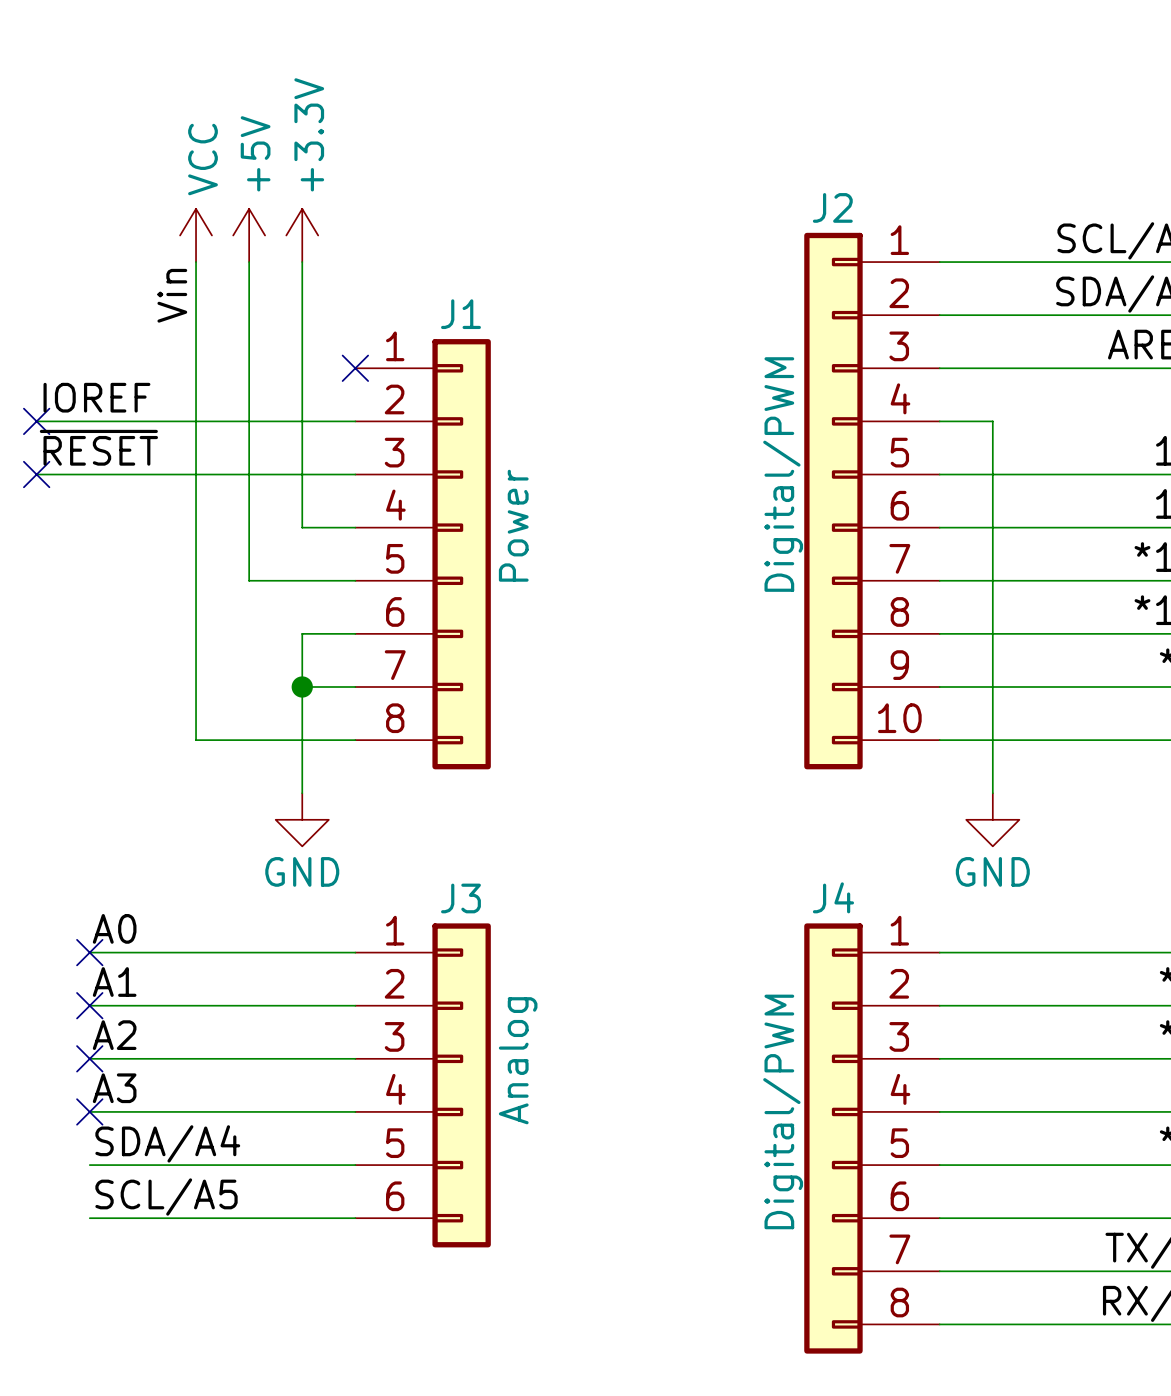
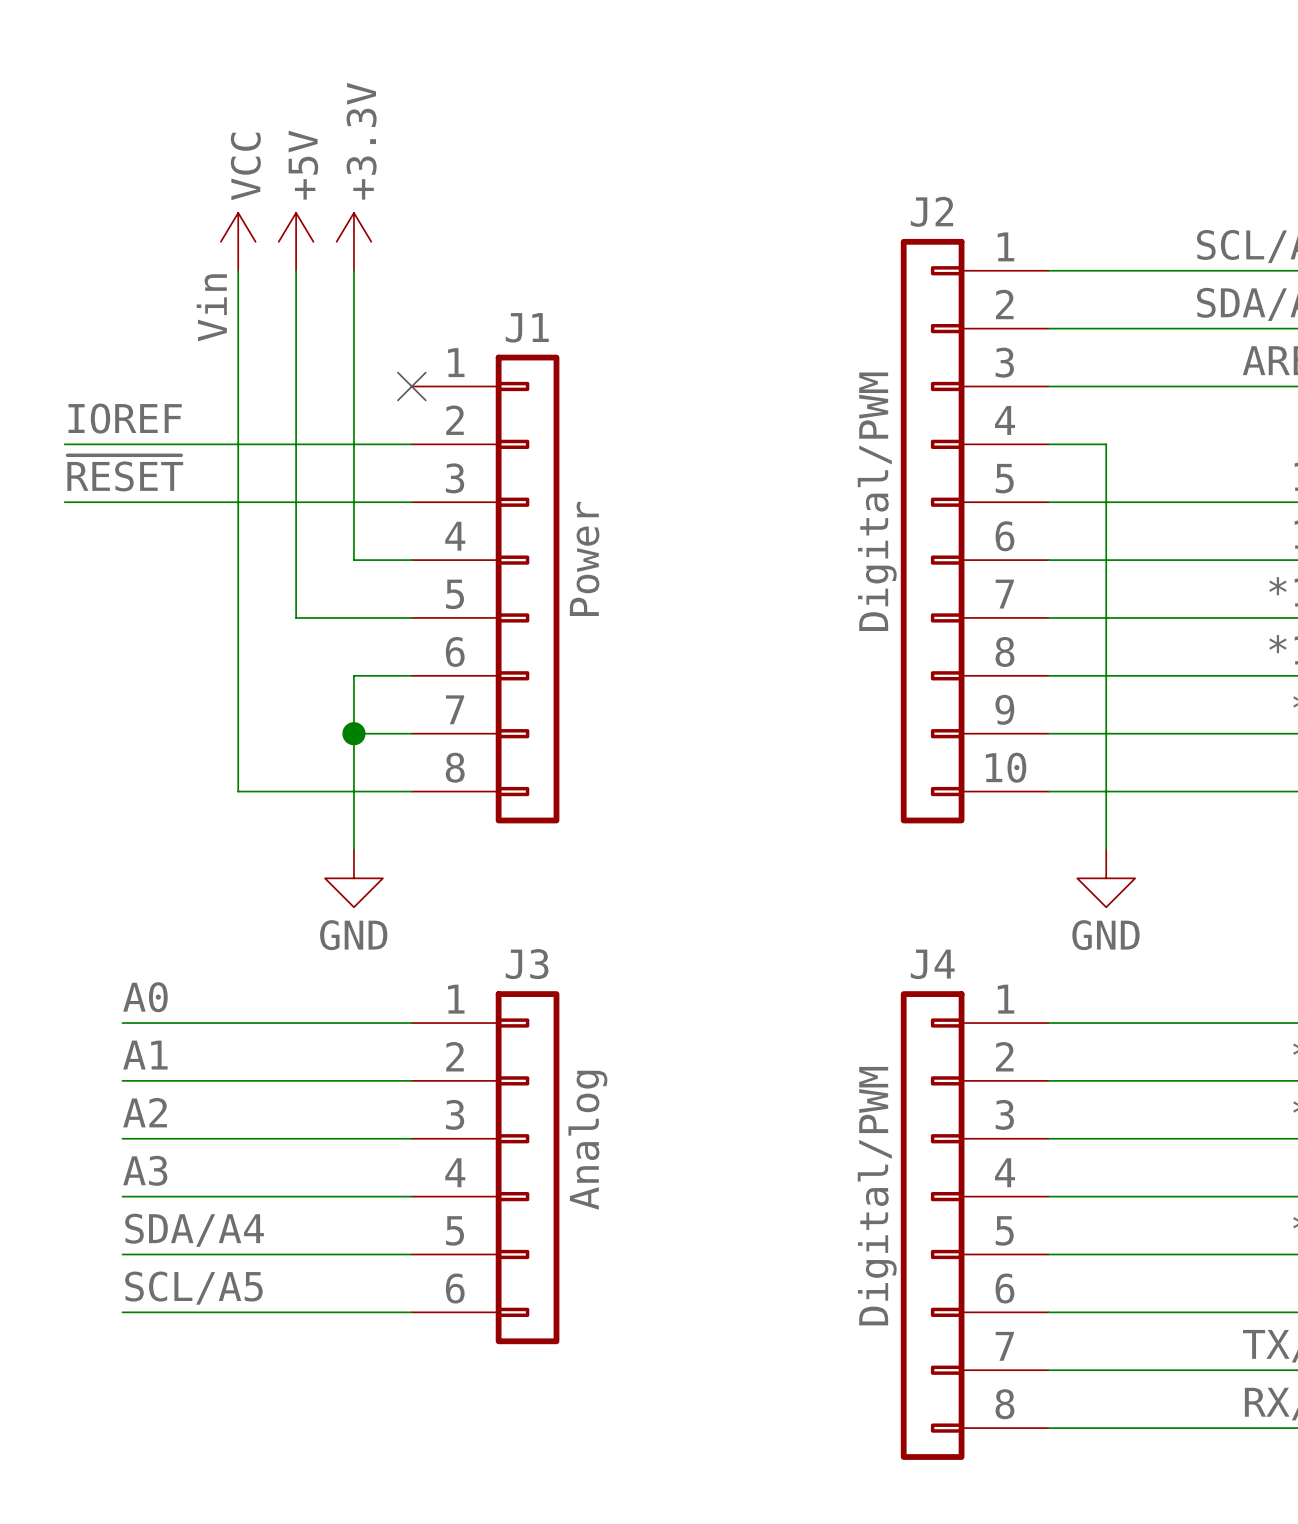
no-connect mark: (36, 421) -> none
no-connect mark: (36, 474) -> none
no-connect mark: (89, 952) -> none
no-connect mark: (89, 1005) -> none
no-connect mark: (89, 1058) -> none
no-connect mark: (89, 1111) -> none

